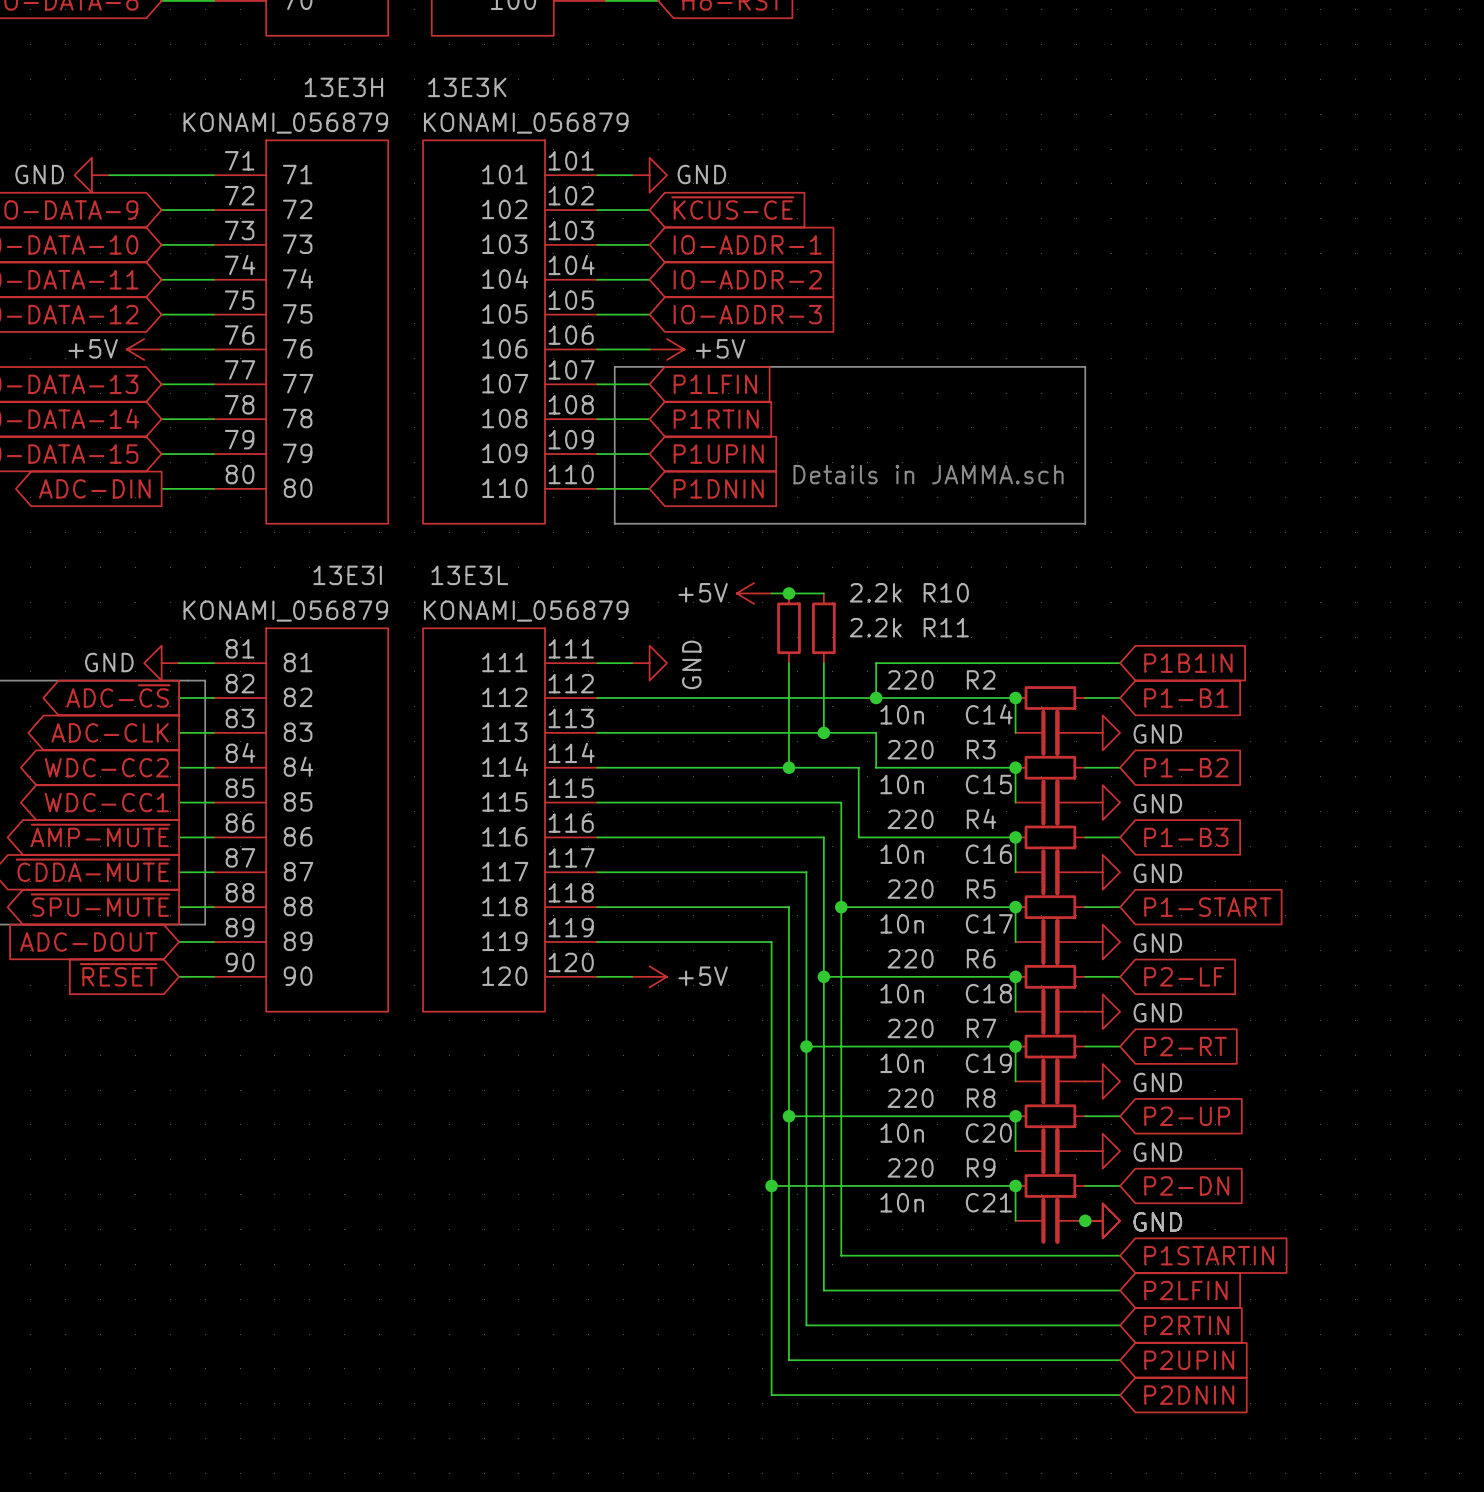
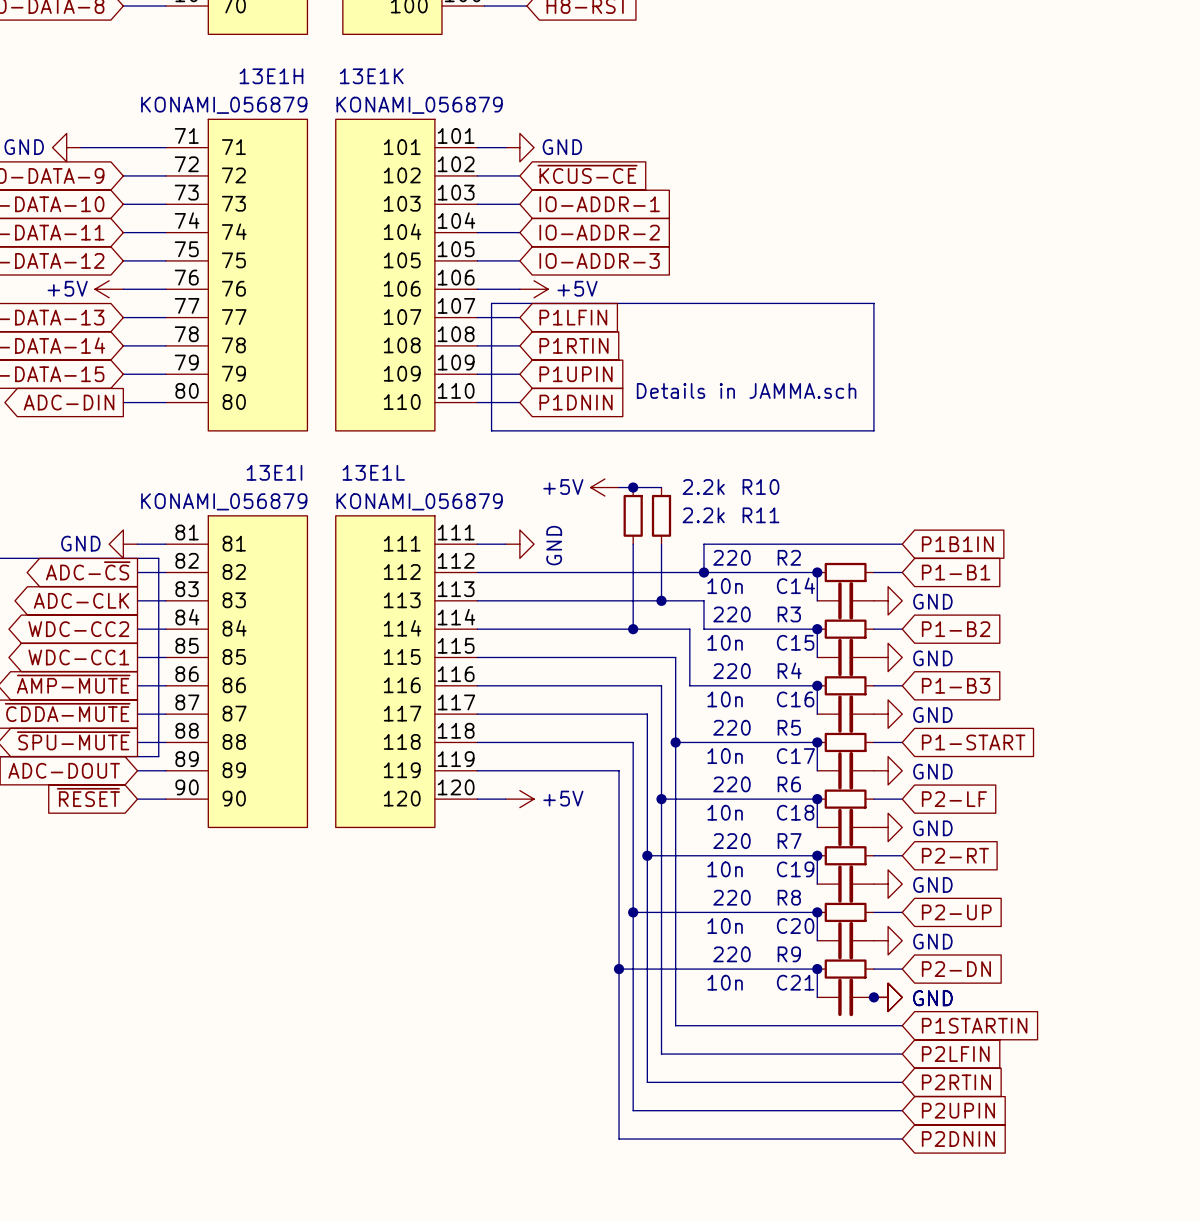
13E3H name: 13E3H (343, 87) -> 13E1H (271, 76)
13E3K name: 13E3K (467, 87) -> 13E1K (371, 76)
13E3I name: 13E3I (347, 575) -> 13E1I (274, 472)
13E3L name: 13E3L (469, 575) -> 13E1L (373, 472)

